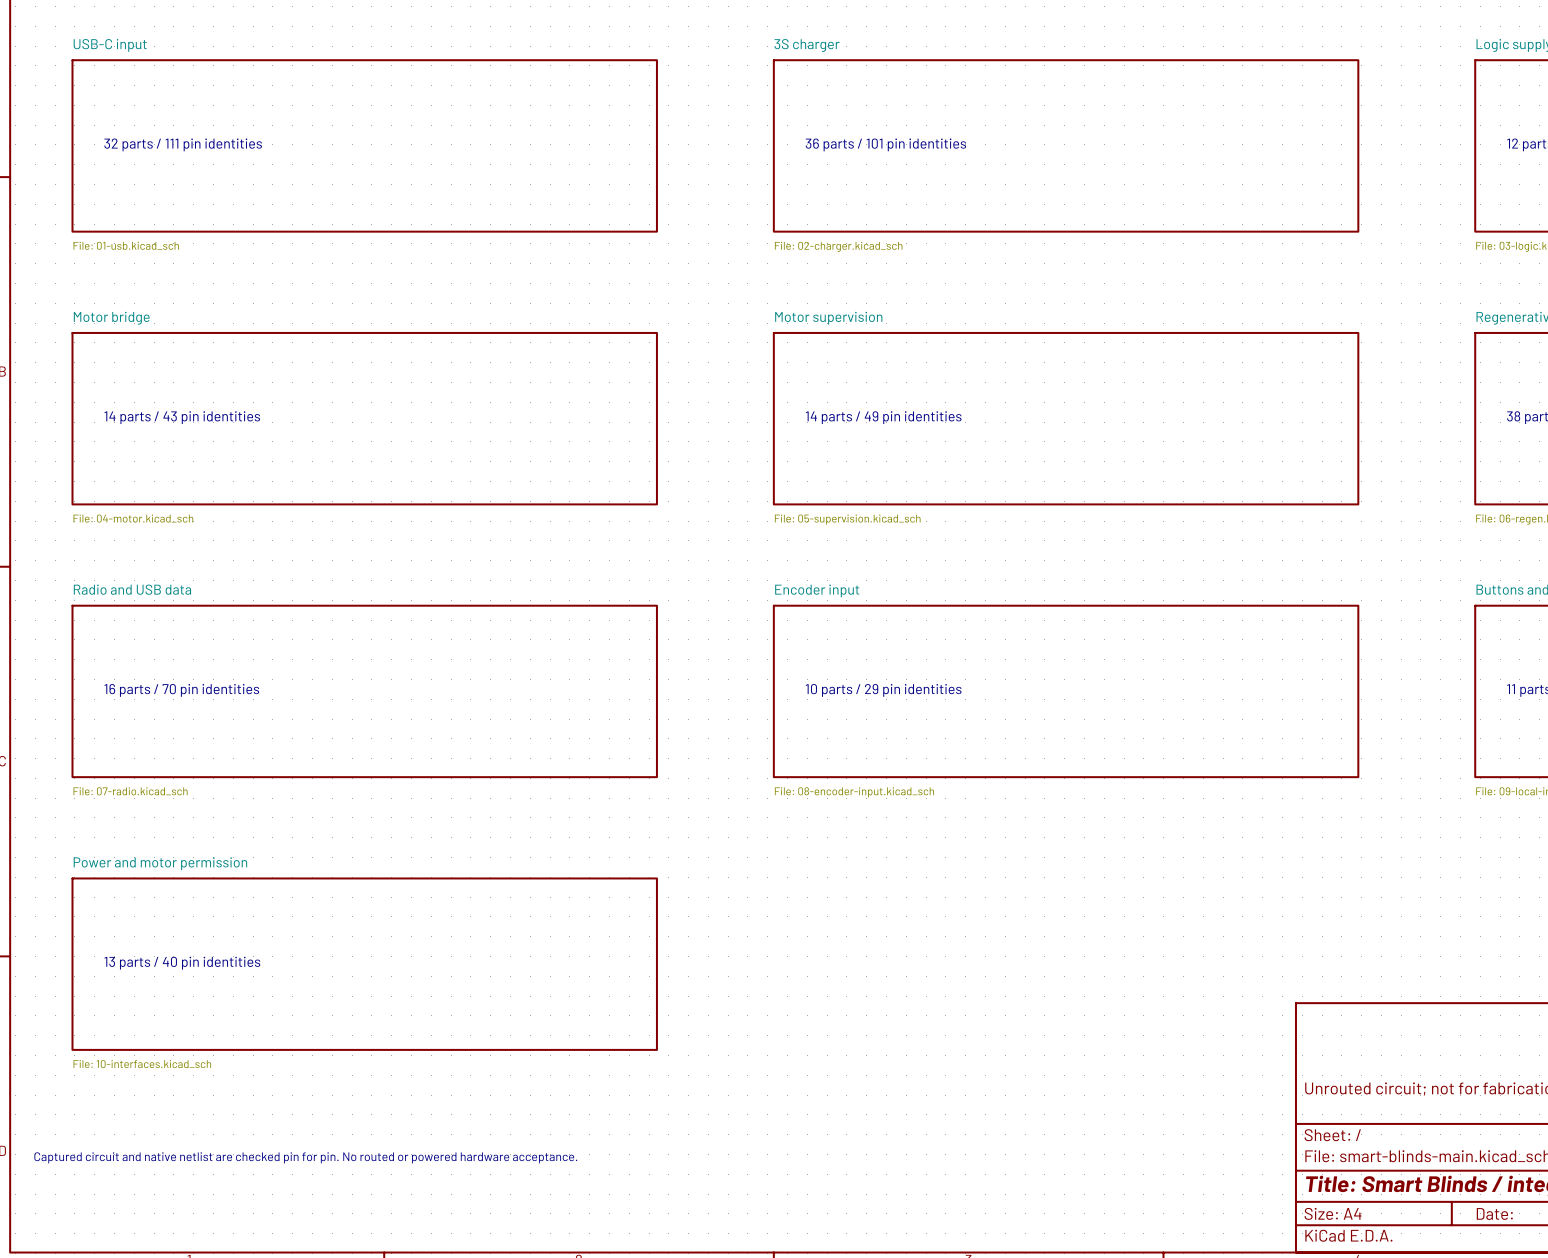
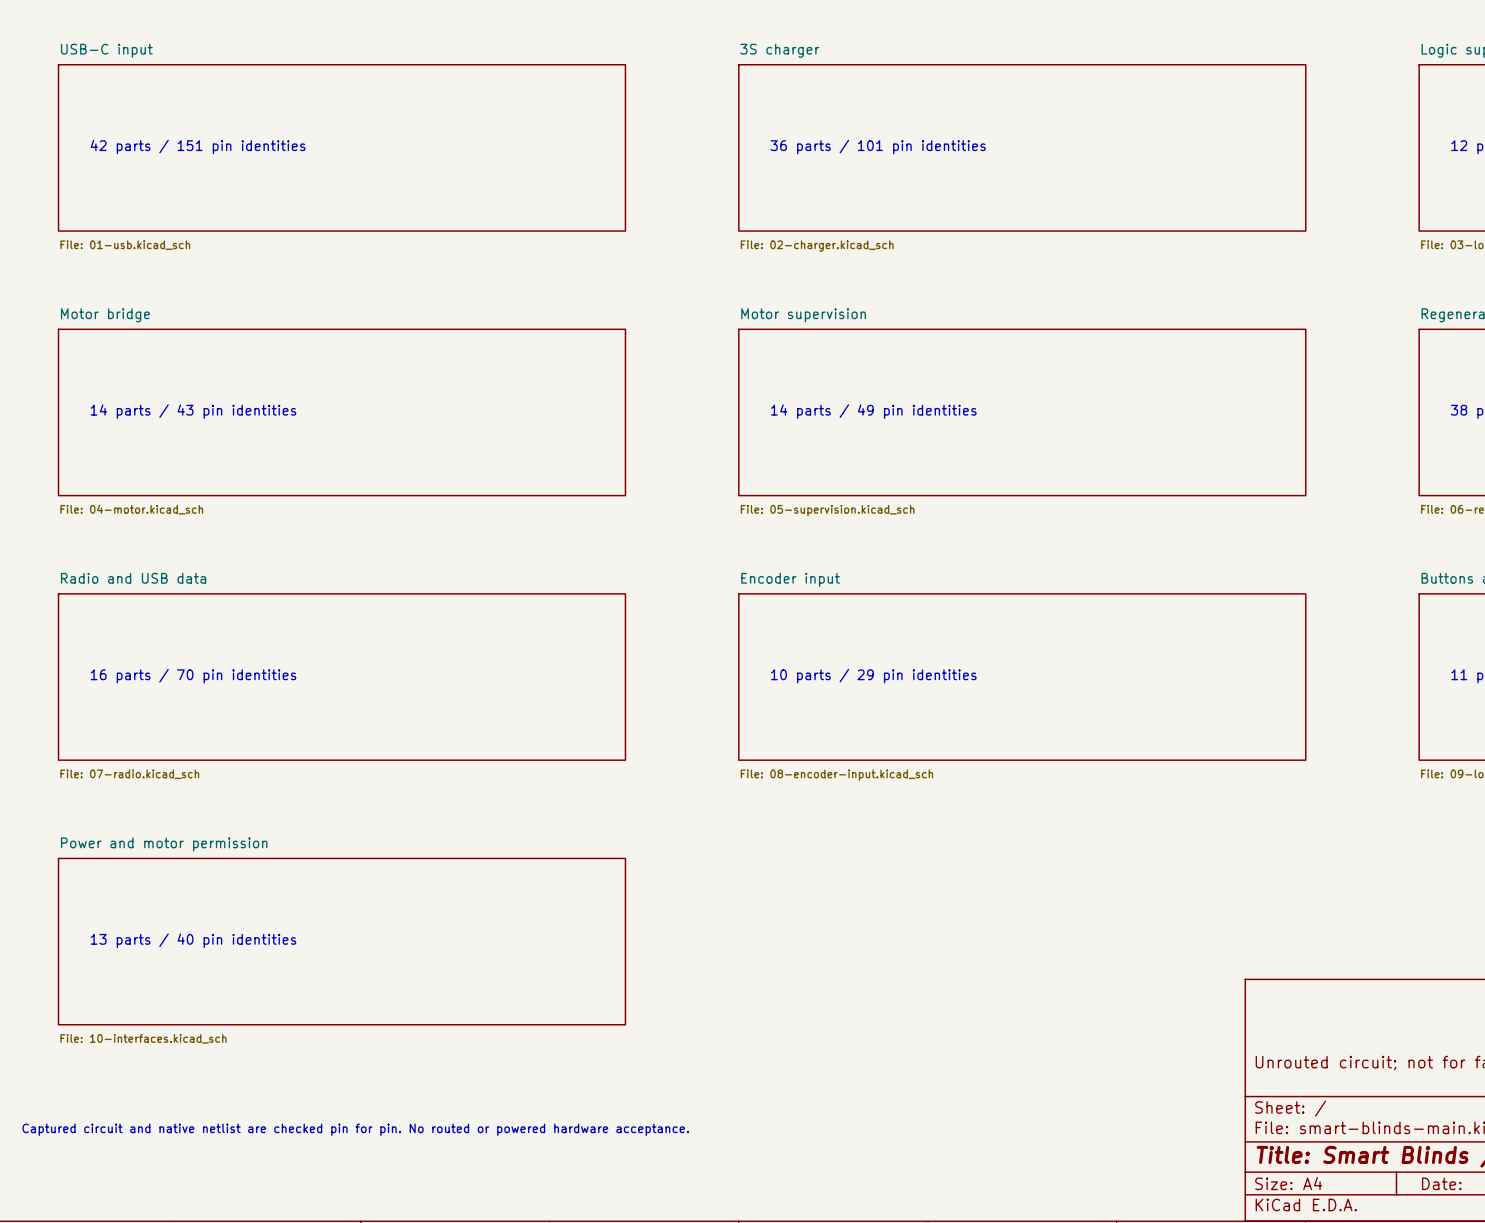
text: 32 parts / 111 pin identities (183, 144) -> 42 parts / 151 pin identities (198, 147)

